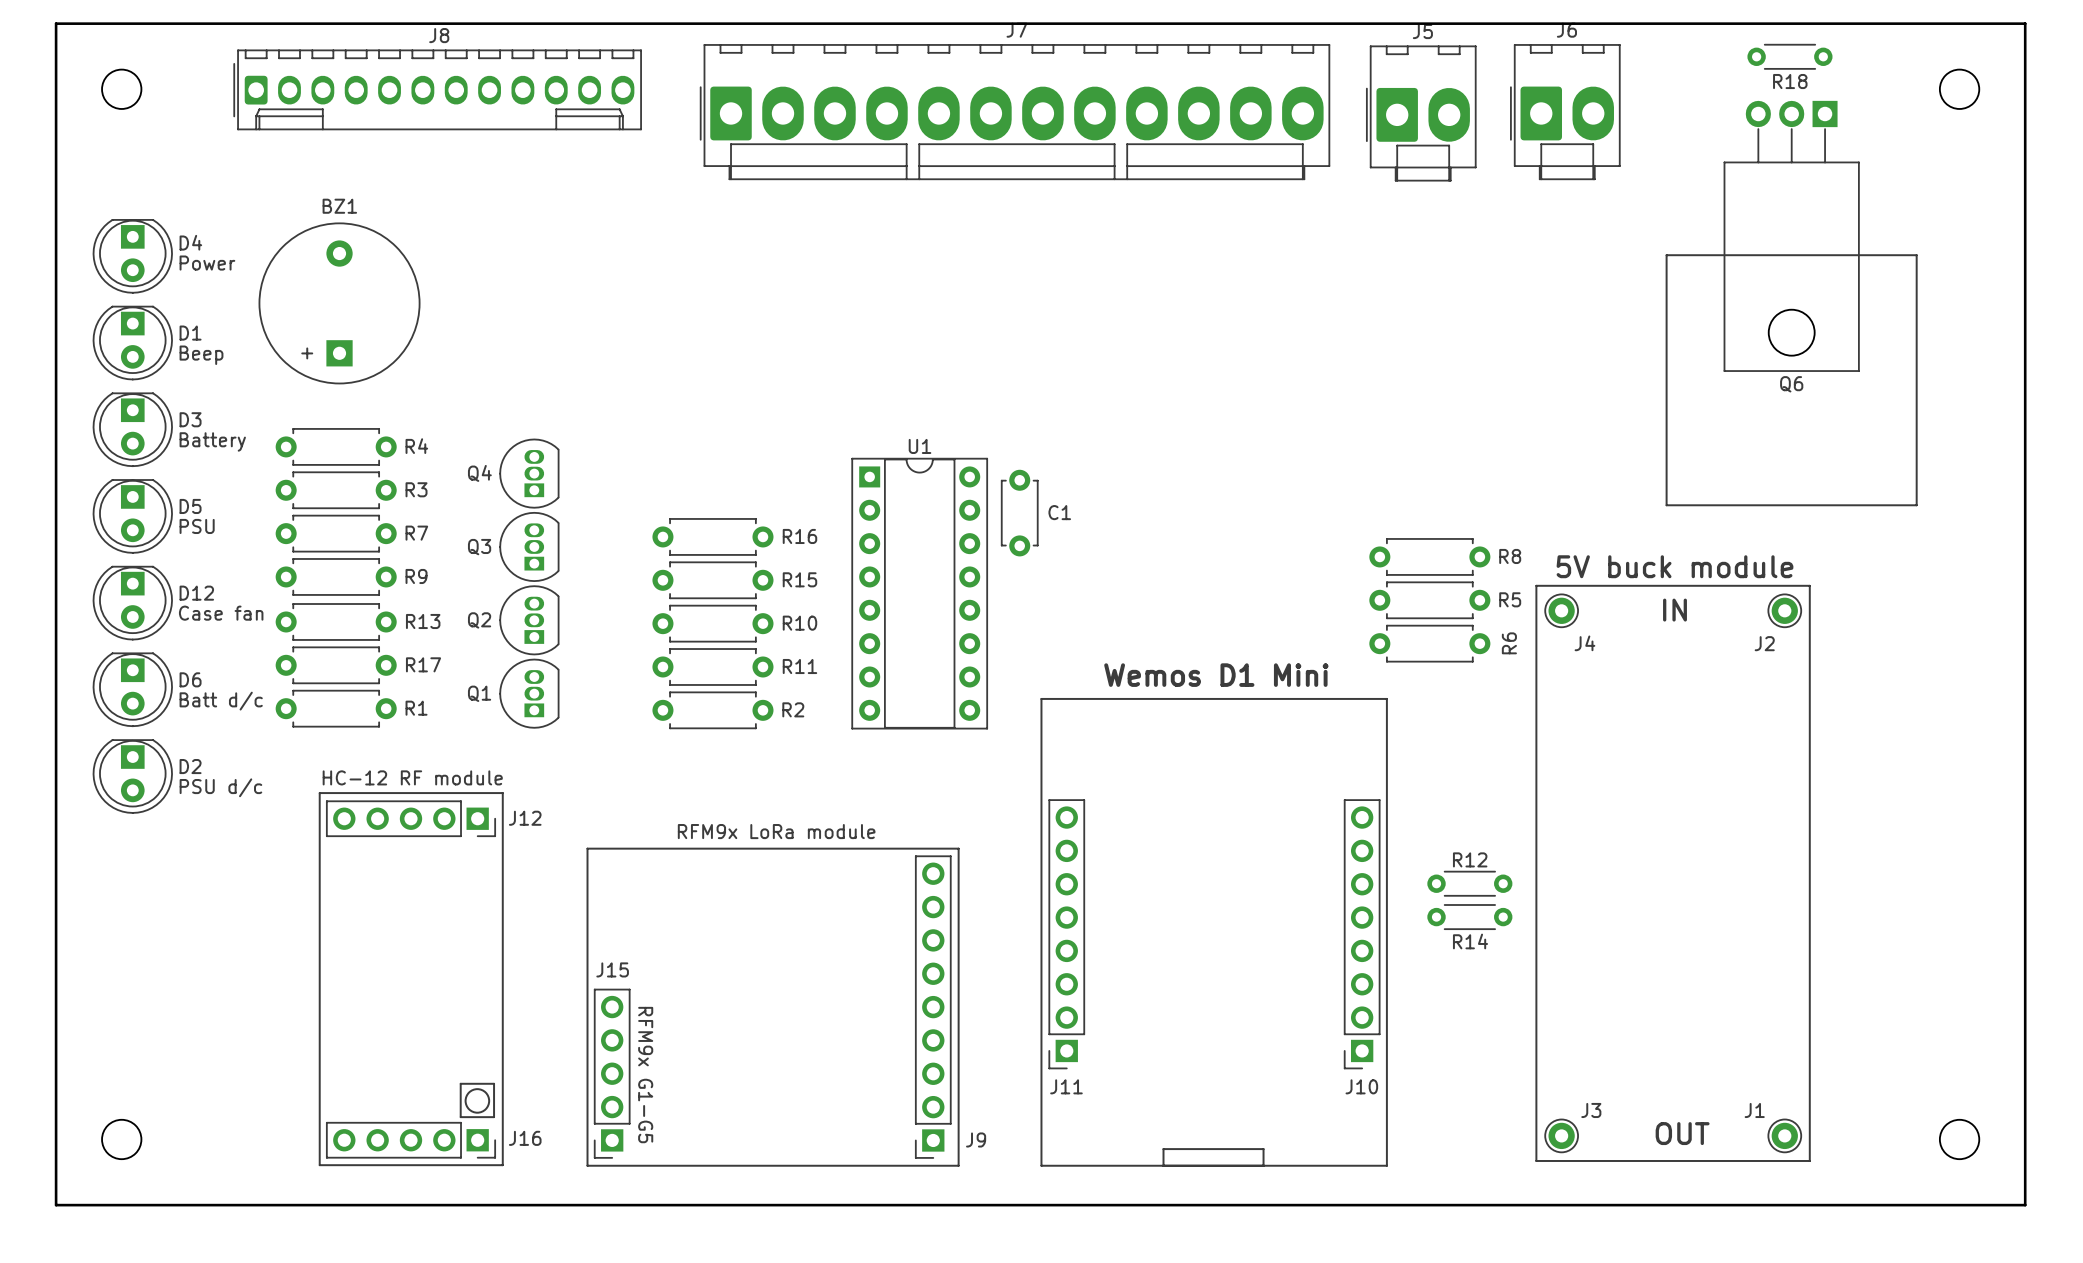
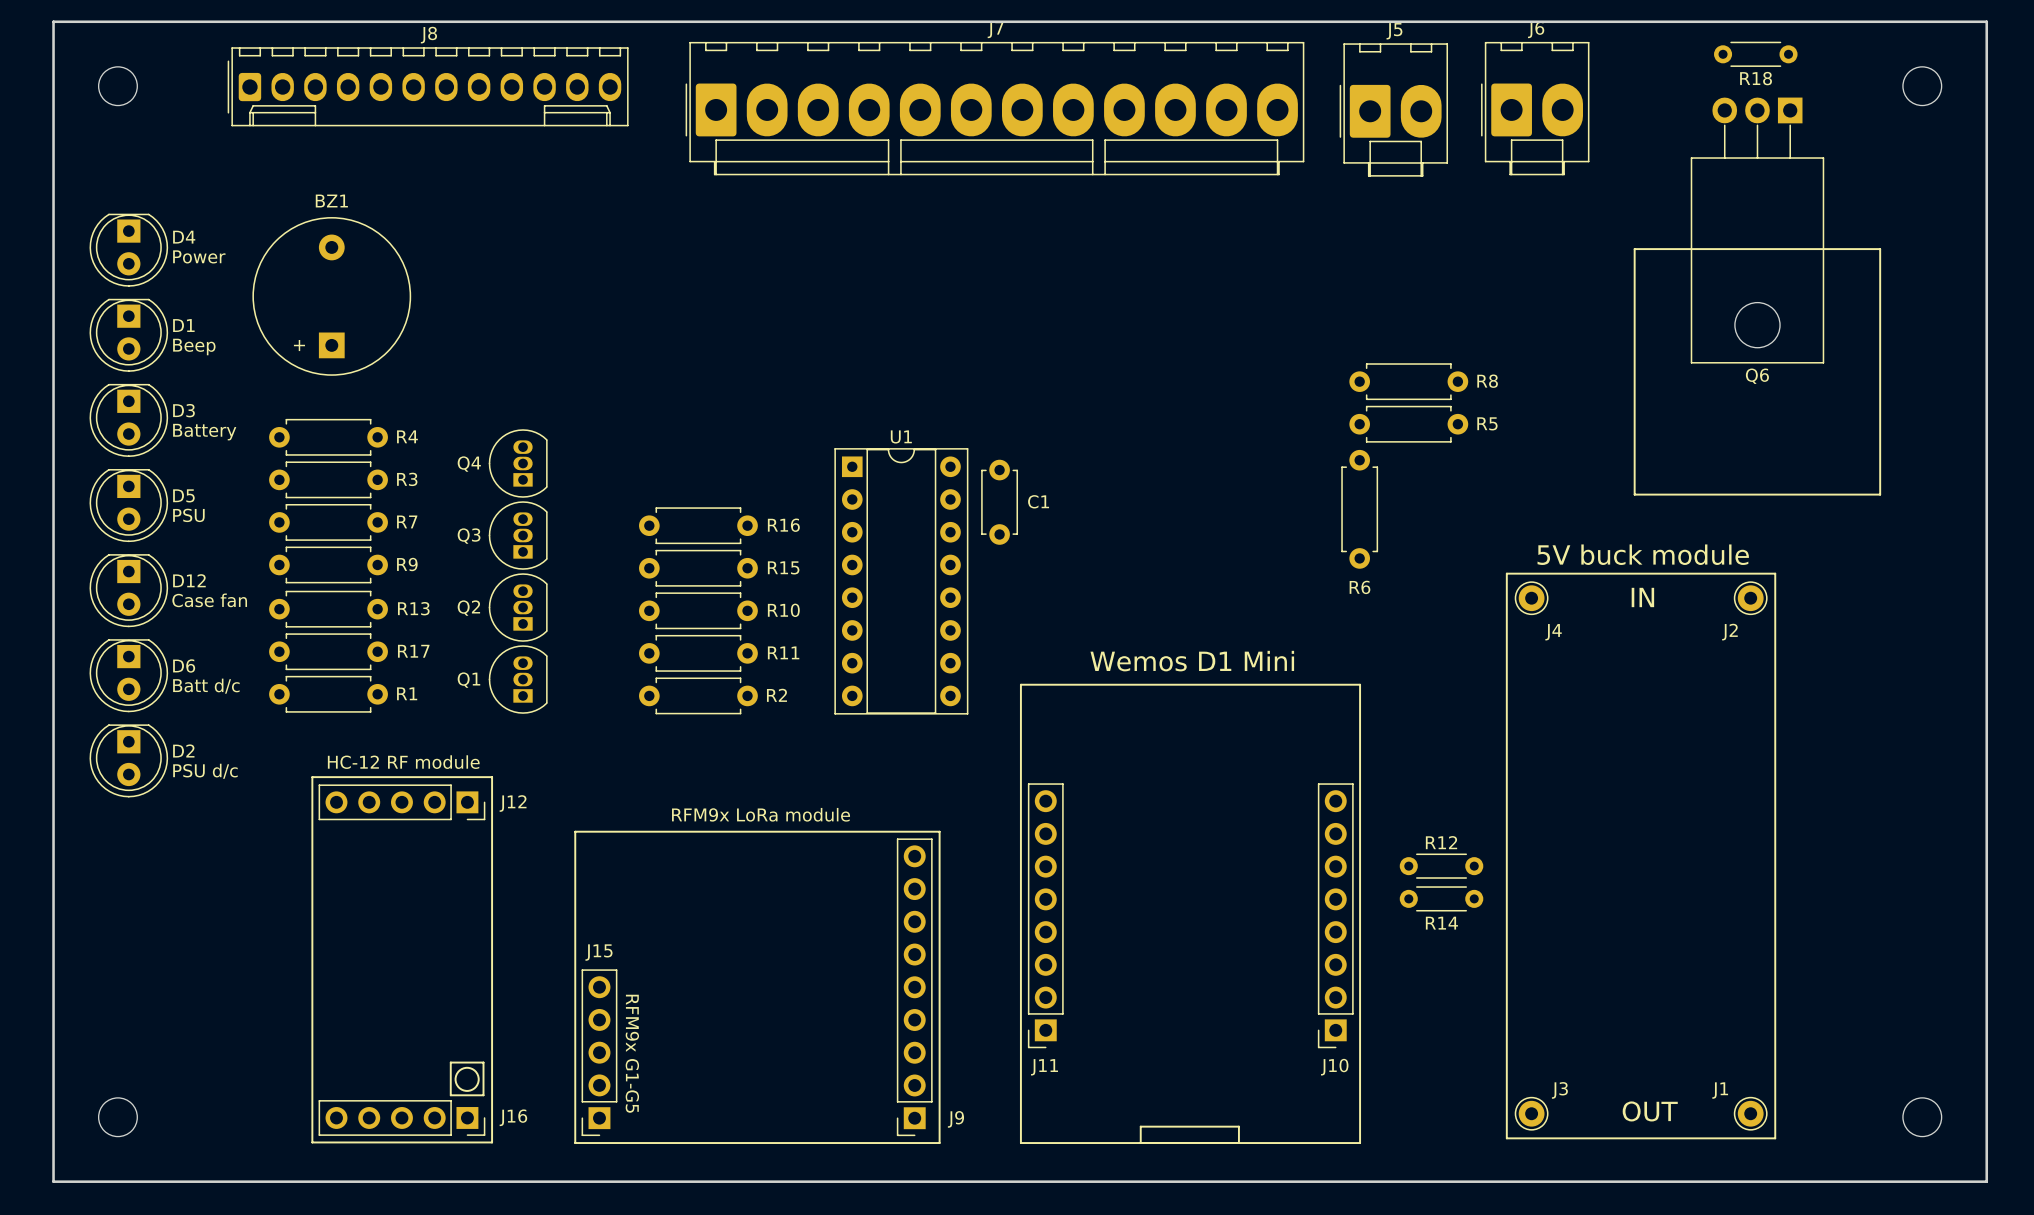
R8 position: (1429, 556) -> (1408, 381)
R5 position: (1429, 600) -> (1408, 424)
R6 rotation: 0° (1429, 643) -> 90° clockwise (1359, 509)
R6 position: (1429, 643) -> (1359, 509)

